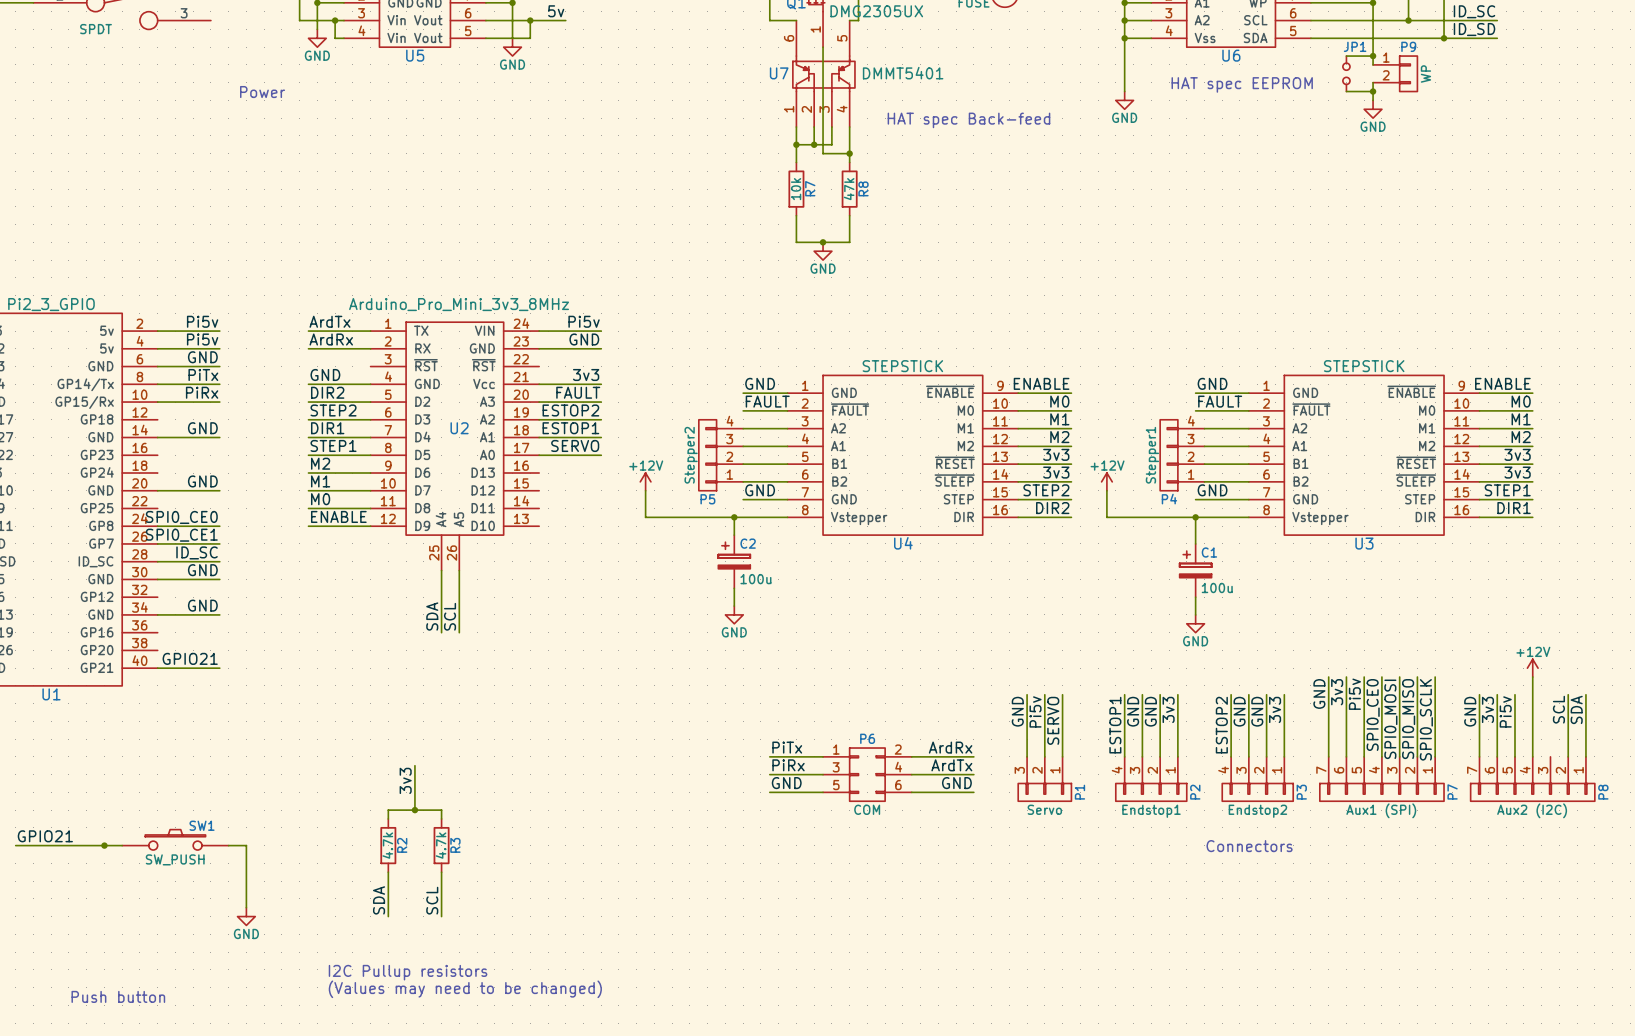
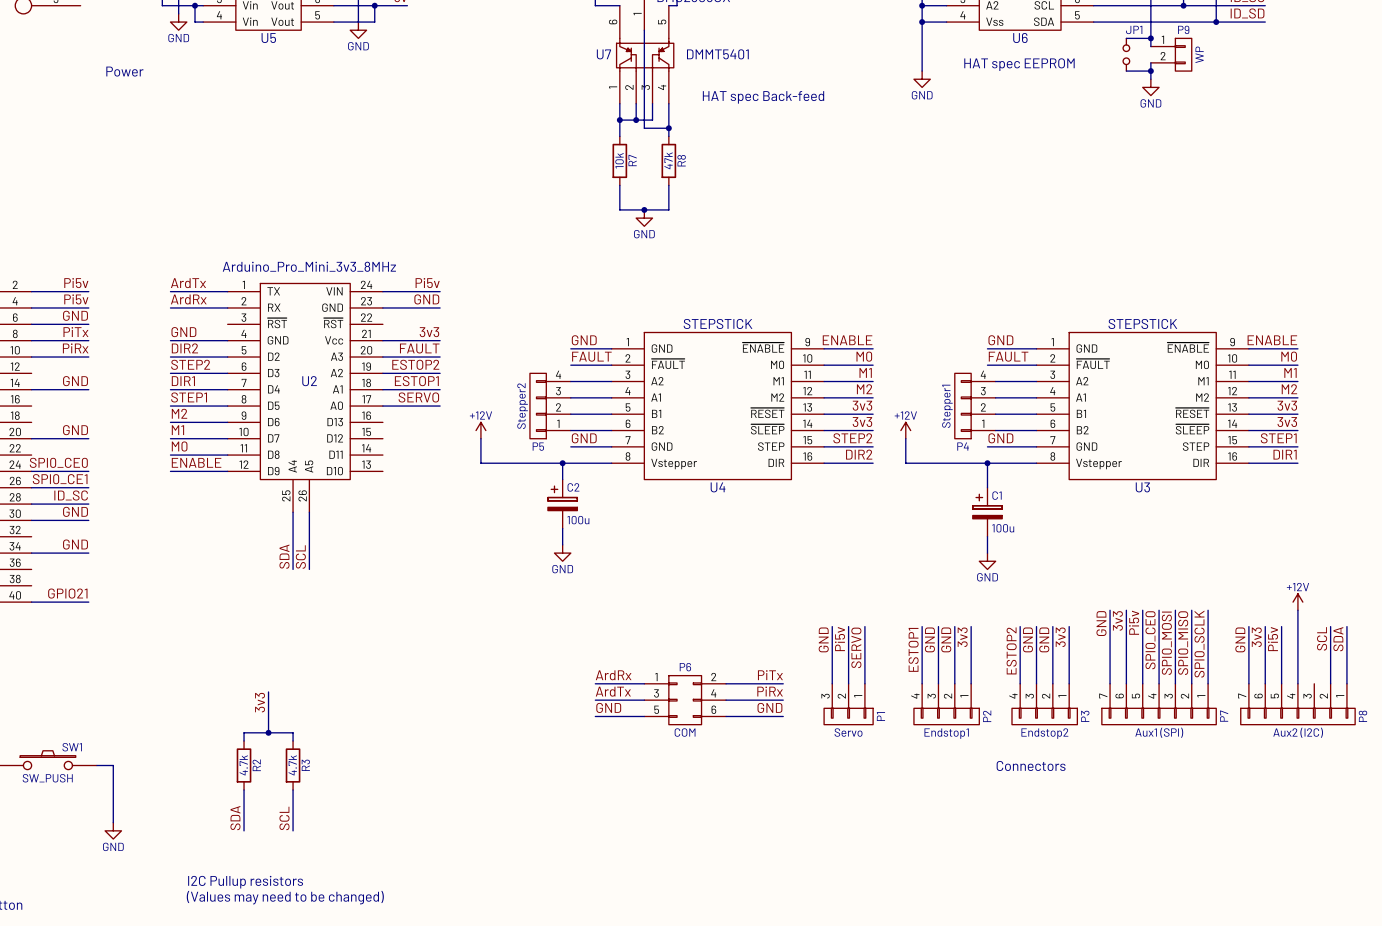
label: PiTx (787, 747) -> ArdRx (613, 675)
label: ArdRx (950, 747) -> PiTx (770, 675)
label: PiRx (788, 765) -> ArdTx (613, 691)
label: ArdTx (951, 765) -> PiRx (770, 691)

